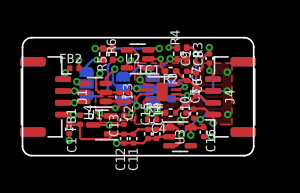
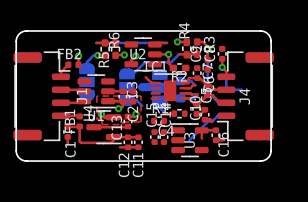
top track: (209, 47) (209, 53) (202, 58) (202, 67) (197, 72) (186, 71) -> none
via: (209, 47) -> none
via: (95, 48) -> none
via: (159, 48) -> none
top track: (126, 49) (133, 49) (138, 54) (138, 65) (139, 67) (148, 67) (148, 72) -> none
via: (170, 58) -> none
bottom track: (120, 59) (114, 59) (107, 65) (107, 89) (100, 96) (86, 96) -> none
top zone outline: (134, 63) (231, 63) (231, 124) (134, 124) (134, 63) -> none
top track: (114, 69) (105, 78) (105, 83) -> none
bottom track: (114, 69) (112, 70) (112, 82) (118, 88) (124, 88) -> none
via: (114, 69) -> none
top track: (176, 71) (185, 80) -> none
via: (65, 72) -> none
via: (148, 72) -> none
via: (227, 72) -> none
top track: (99, 73) (96, 77) (96, 89) (98, 92) (105, 92) -> none
via: (99, 73) -> none
via: (139, 79) -> none
via: (76, 81) -> none
via: (185, 86) -> none
via: (136, 88) -> none
top track: (137, 89) (149, 89) -> none
via: (74, 90) -> none
via: (227, 90) -> none
top track: (149, 94) (140, 94) (136, 98) (136, 105) -> none
via: (187, 95) -> none
top track: (149, 98) (143, 101) (143, 107) (147, 111) (147, 119) -> none
via: (74, 102) -> none
top track: (184, 103) (175, 112) -> none
via: (136, 105) -> none
top track: (193, 108) (204, 108) (213, 114) (213, 123) -> none
via: (147, 111) -> none
via: (157, 111) -> none
via: (73, 114) -> none
via: (227, 114) -> none
via: (200, 119) -> none
via: (180, 120) -> none
via: (213, 123) -> none
via: (109, 124) -> none
top track: (133, 134) (138, 129) (176, 127) (179, 131) (179, 142) (176, 145) (169, 145) -> none
via: (181, 134) -> none
via: (190, 135) -> none
top track: (169, 136) (148, 138) (143, 143) (133, 143) -> none
via: (211, 136) -> none
via: (69, 140) -> none
via: (116, 143) -> none

